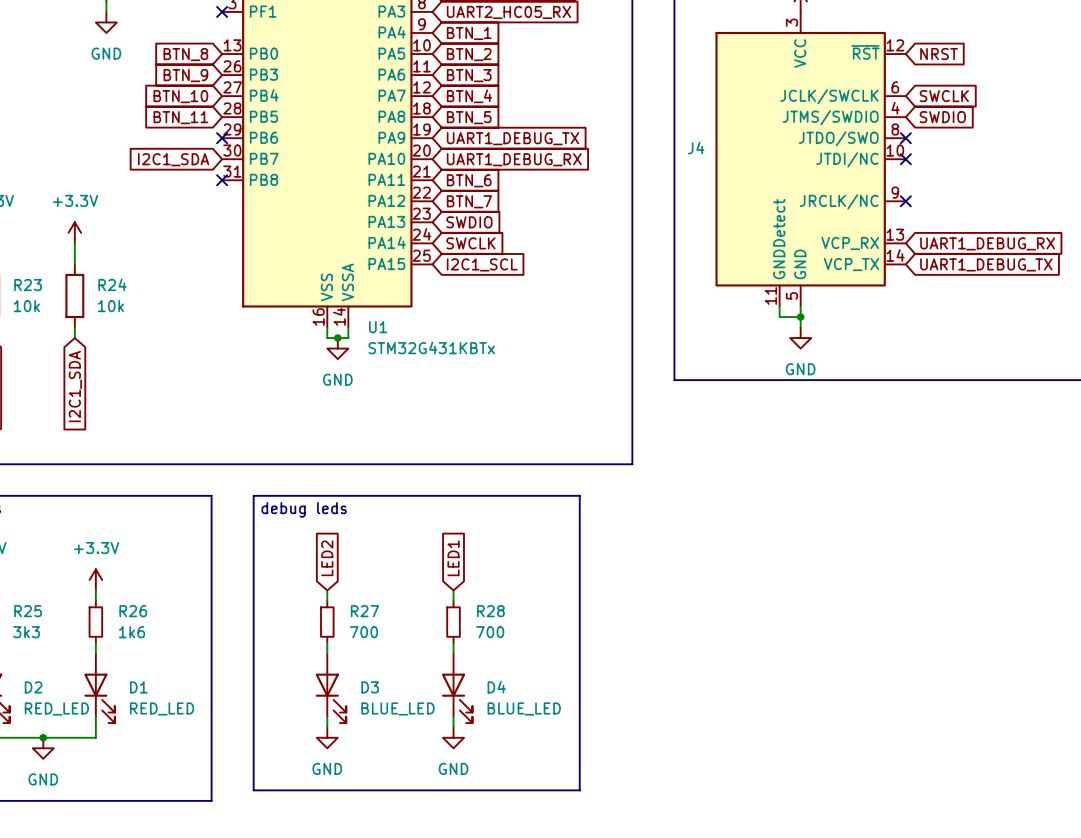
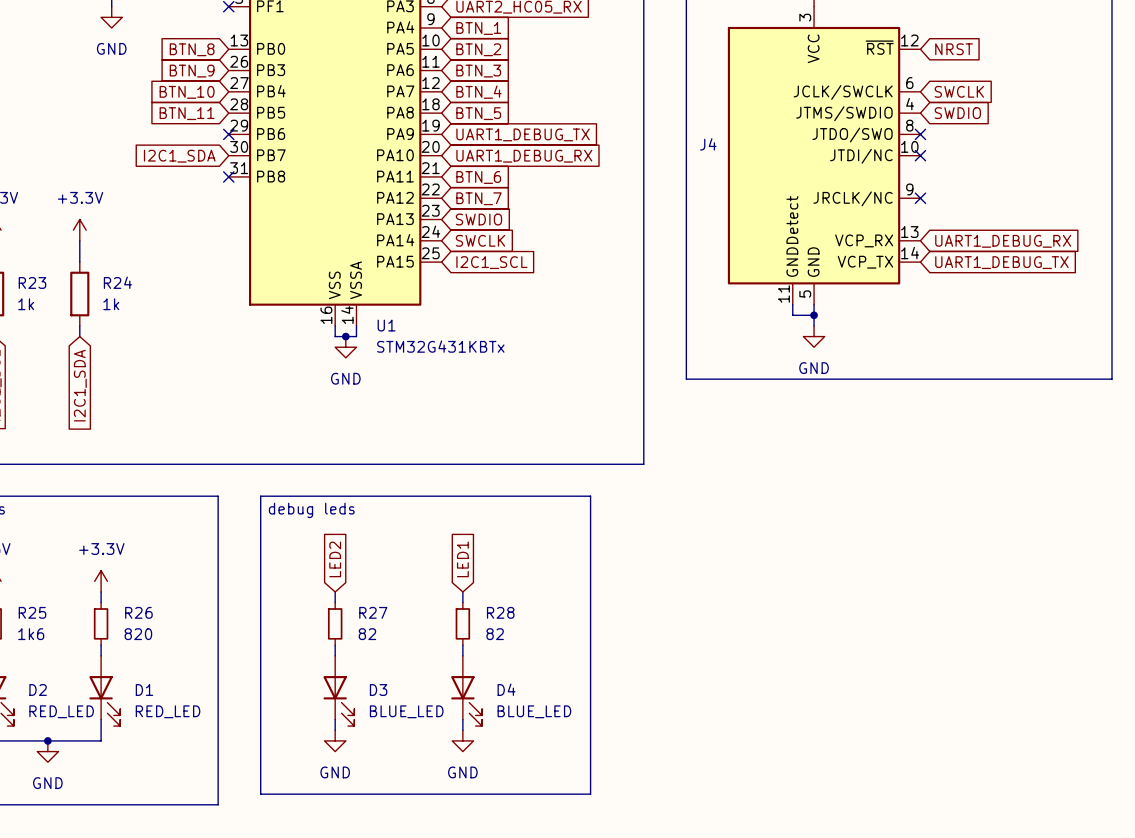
R23 value: 10k (26, 306) -> 1k (26, 304)
R24 value: 10k (110, 306) -> 1k (111, 304)
R25 value: 3k3 (26, 632) -> 1k6 (31, 634)
R26 value: 1k6 (132, 632) -> 820 (138, 634)
R27 value: 700 (363, 632) -> 82 (367, 634)
R28 value: 700 (490, 632) -> 82 (495, 634)

